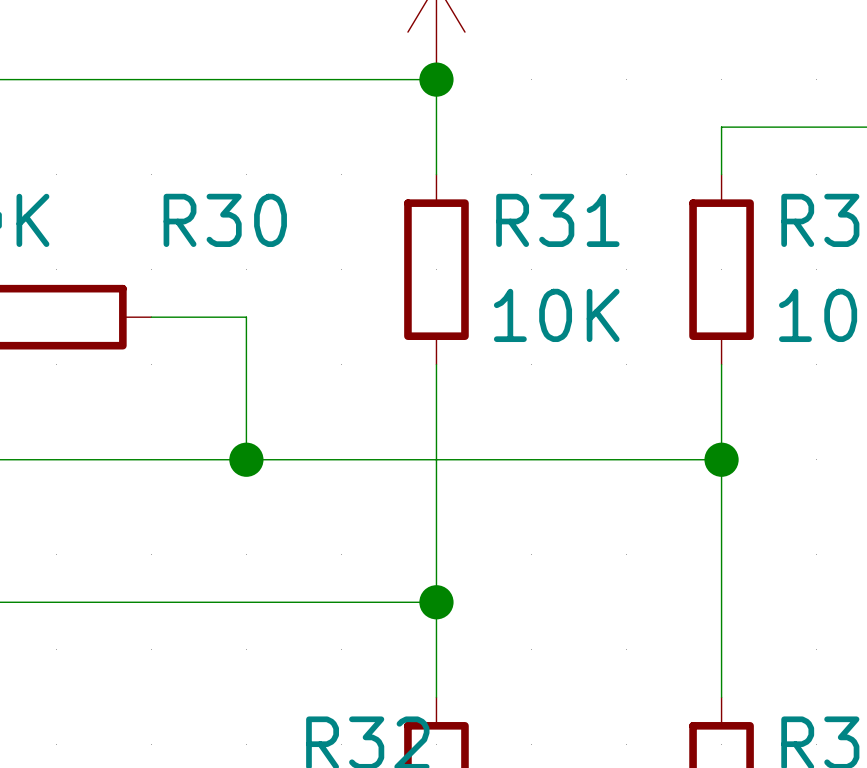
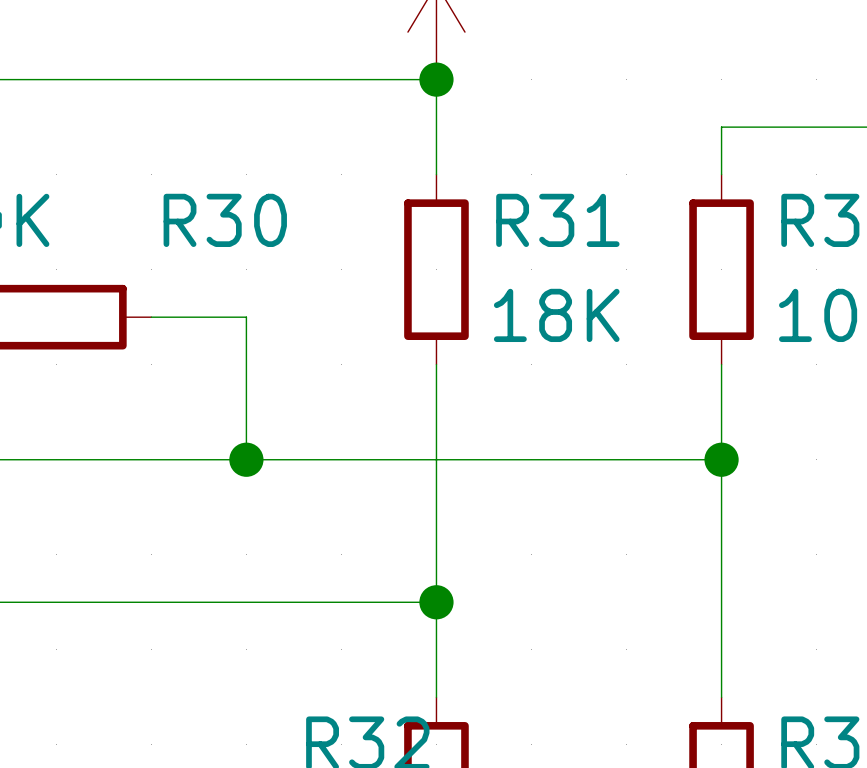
R31 value: 10K (556, 315) -> 18K (556, 315)

